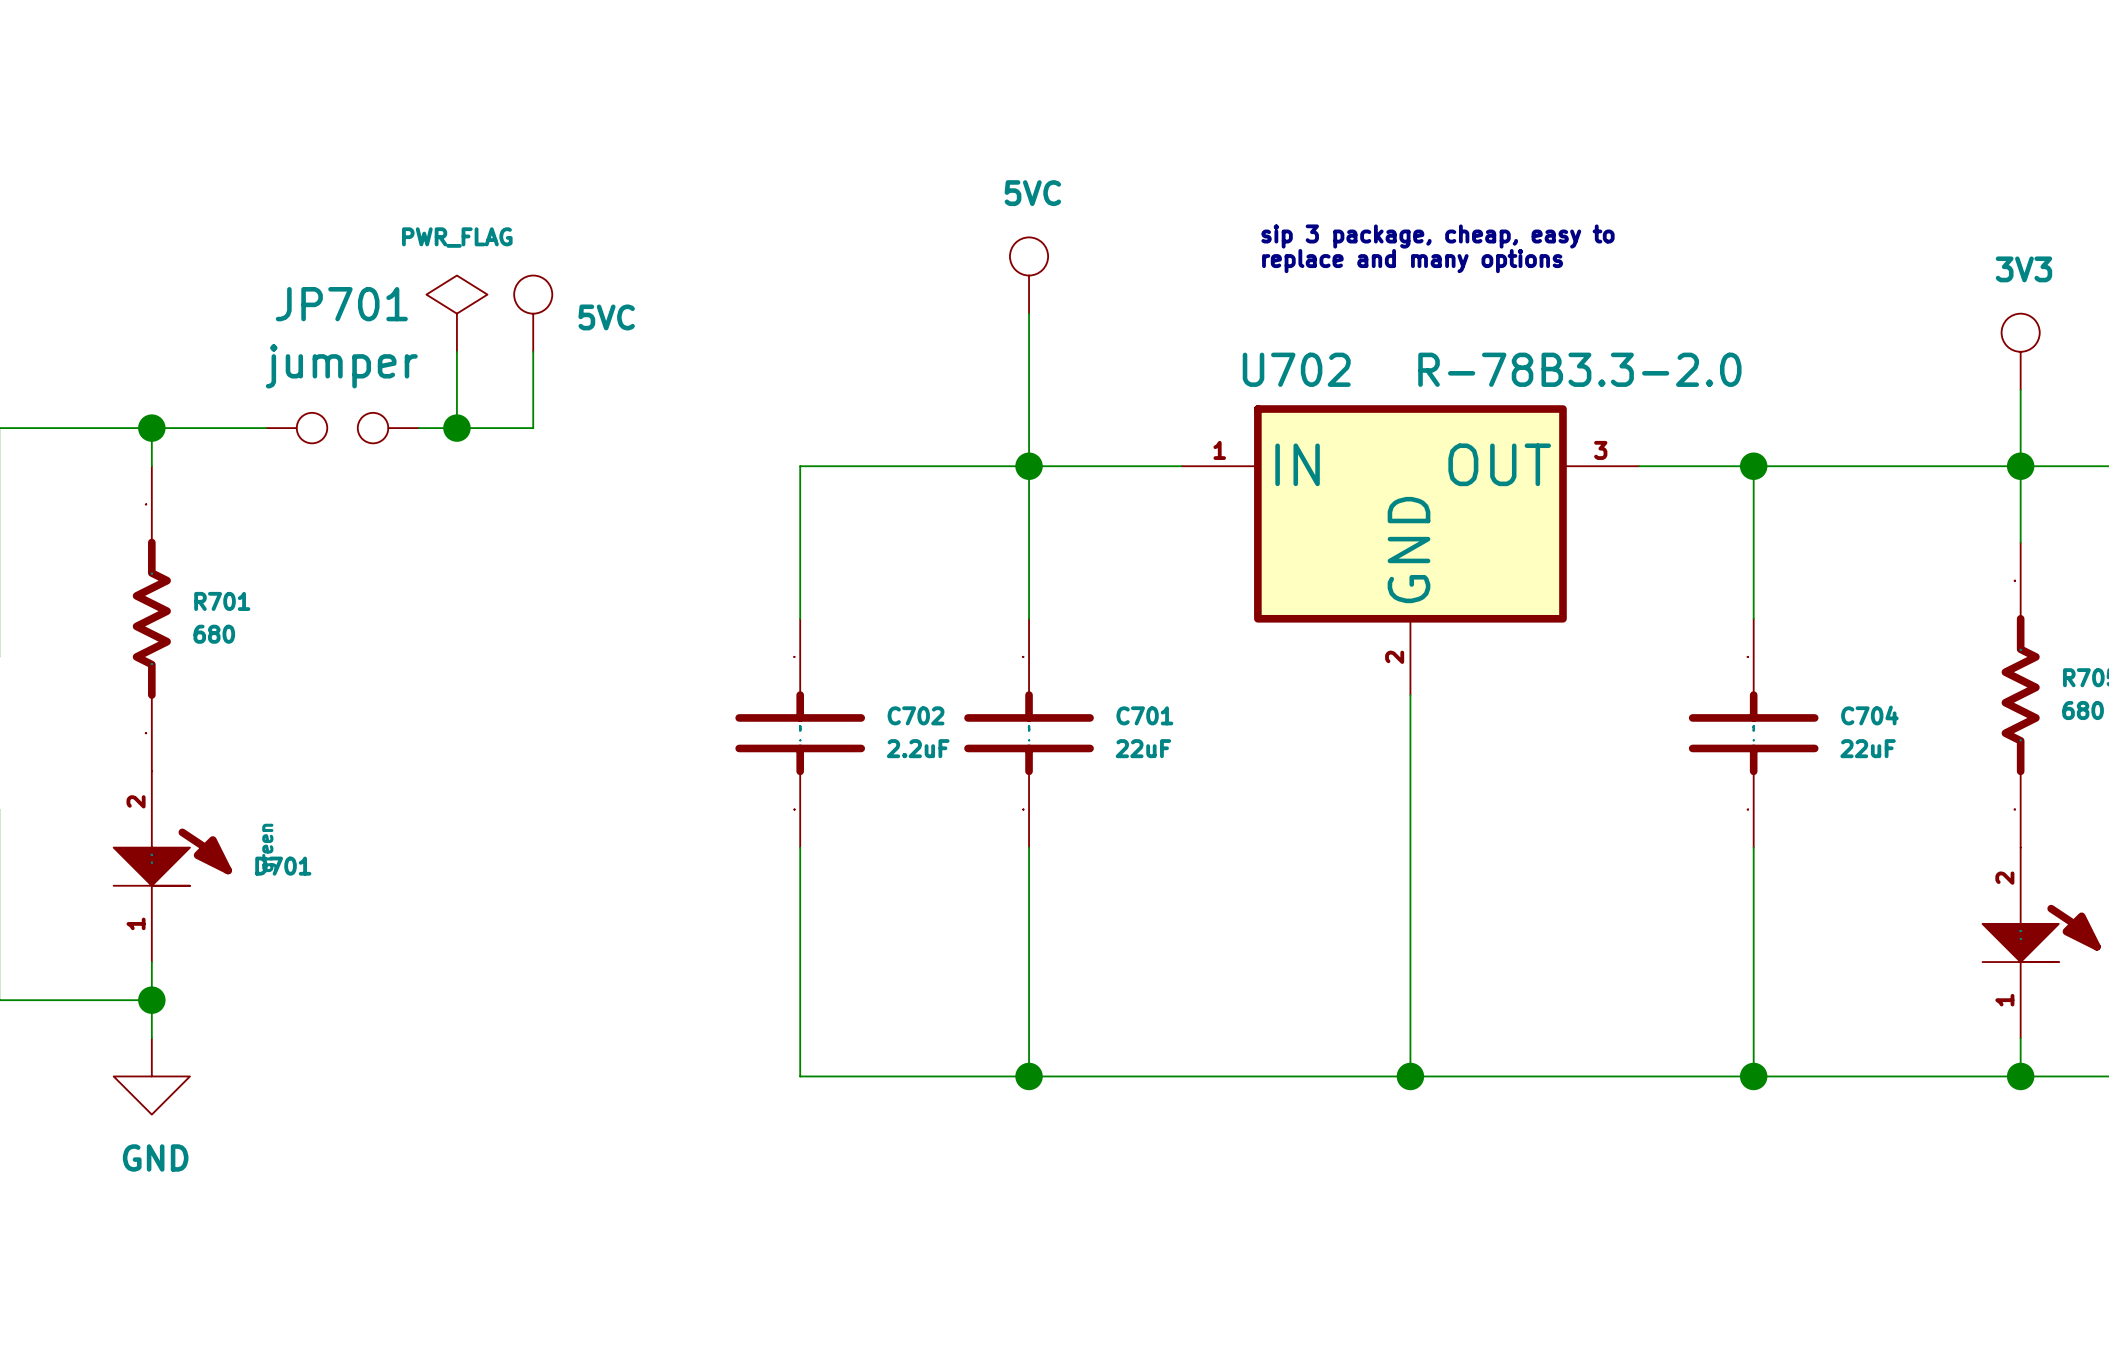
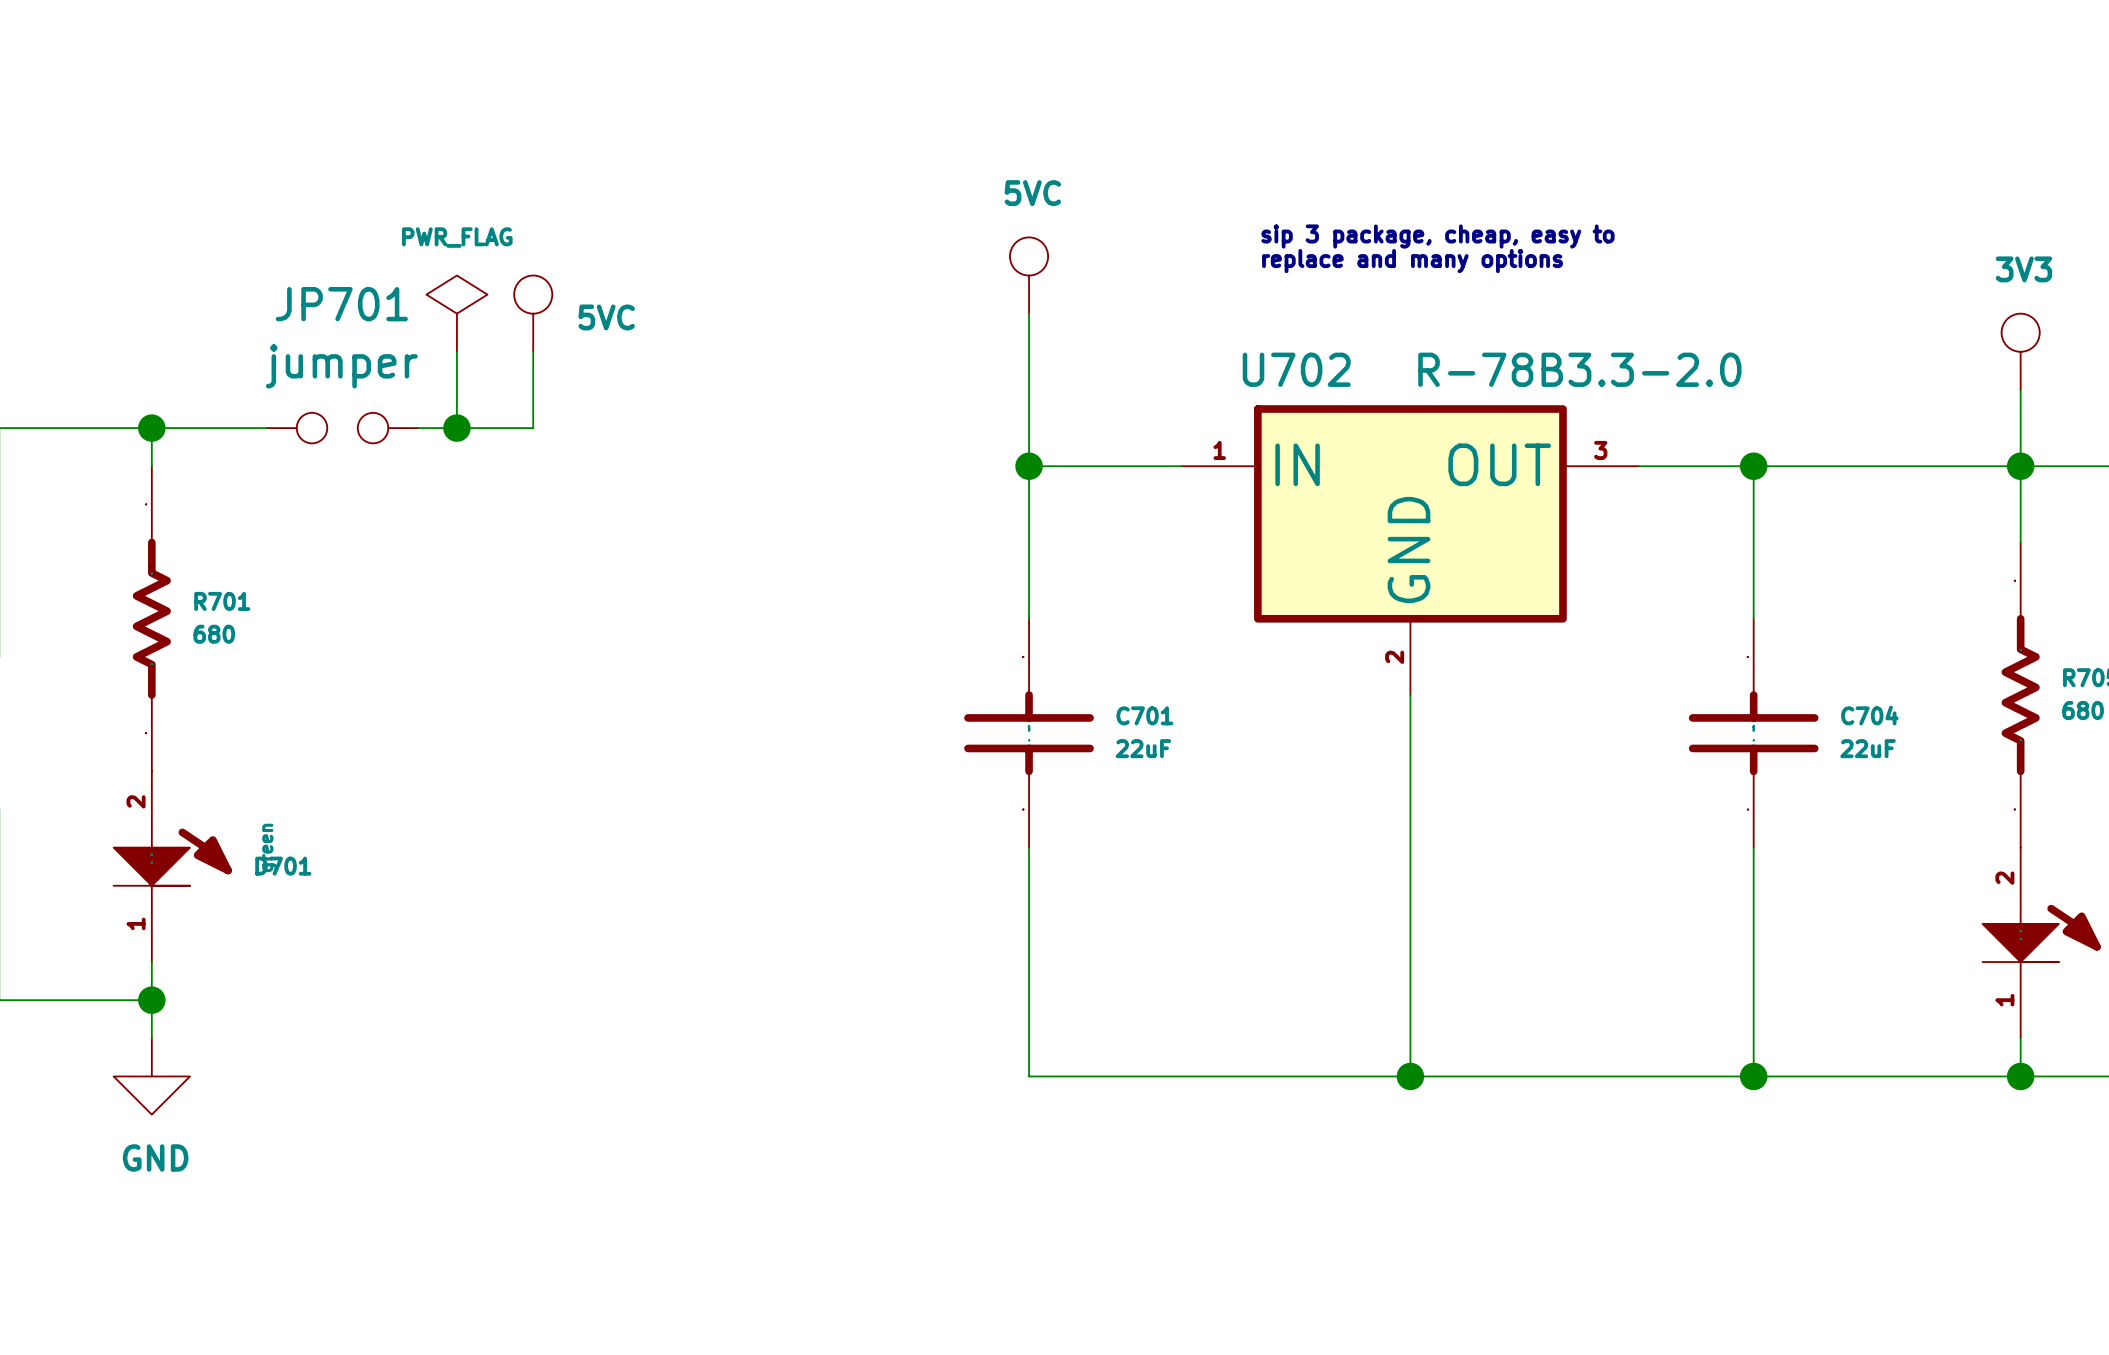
wire: (1029, 466) (800, 466) (800, 618) -> none
C702: 2.2uF (800, 733) -> none
wire: (800, 847) (800, 1076) (1029, 1076) -> none
junction: (1029, 1076) -> none

